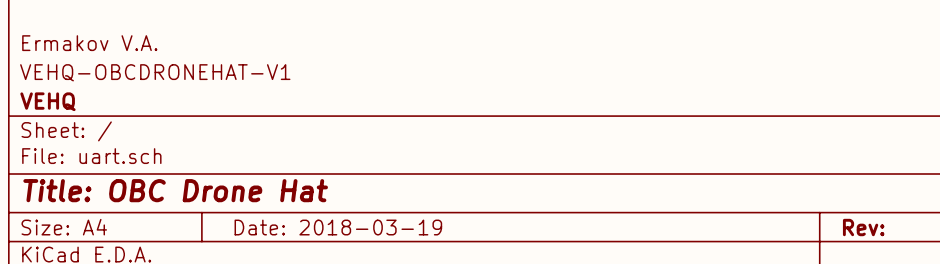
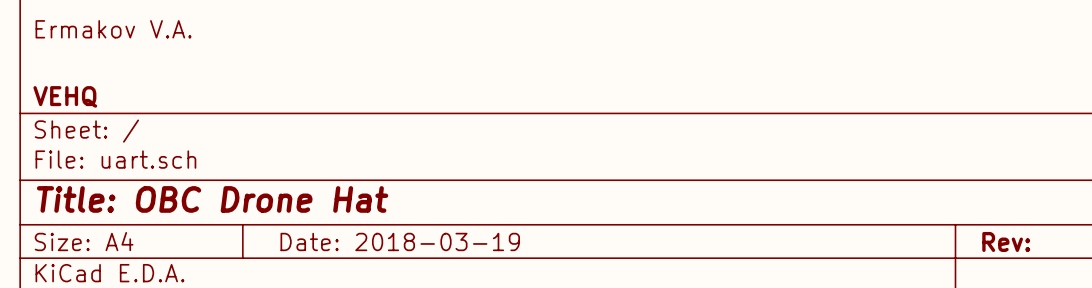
title block: VEHQ-OBCDRONEHAT-V1 (155, 72) -> none

